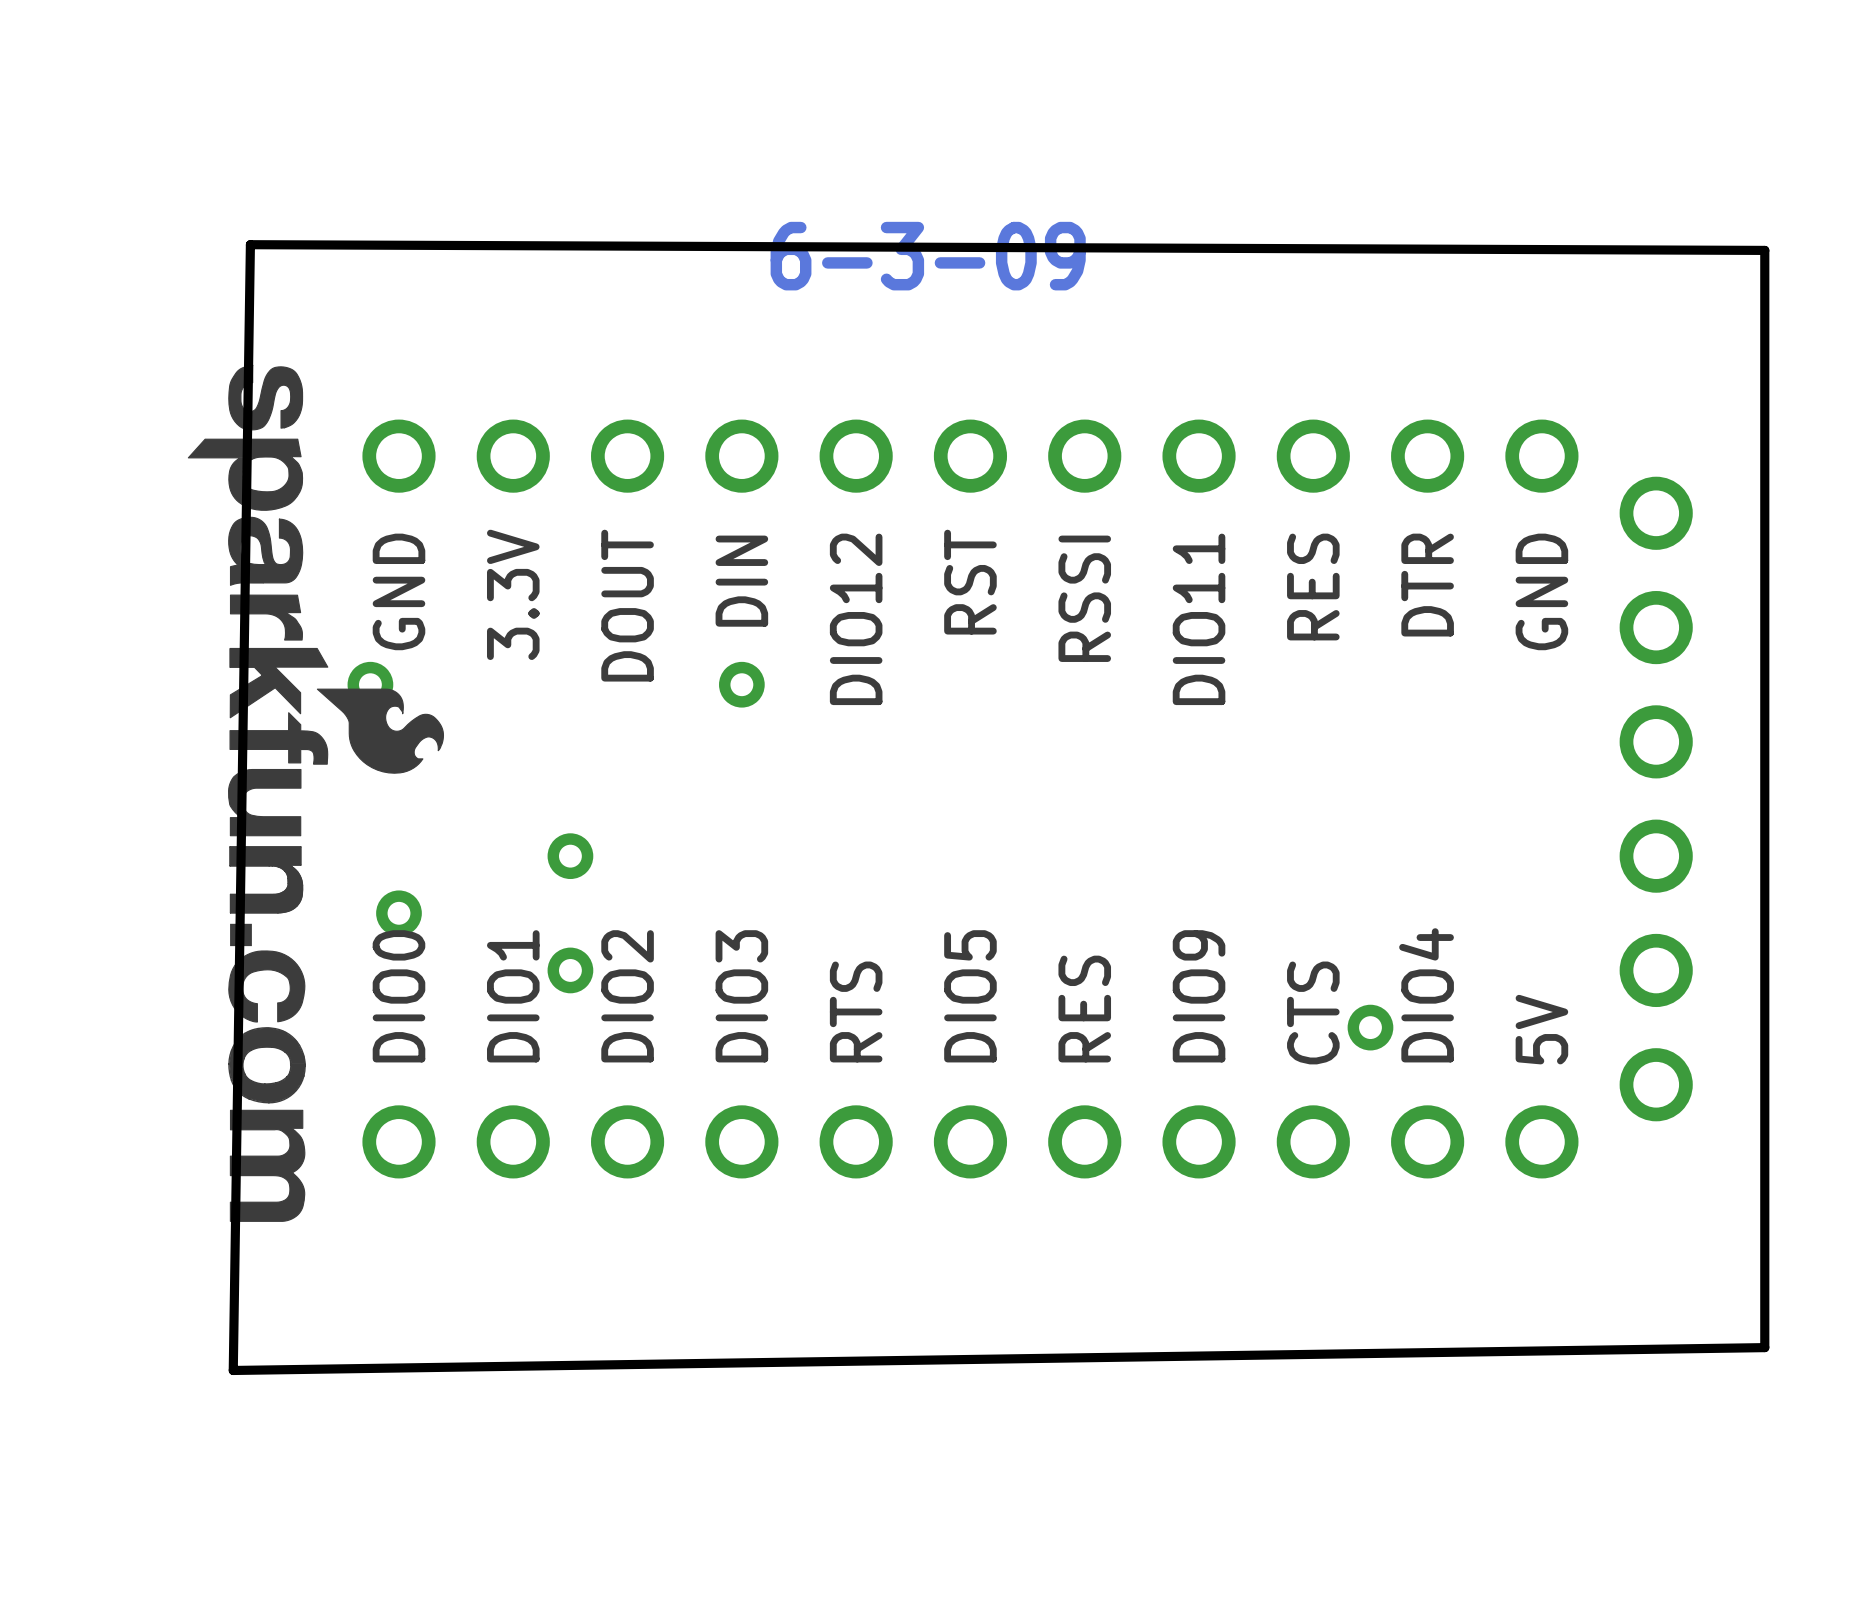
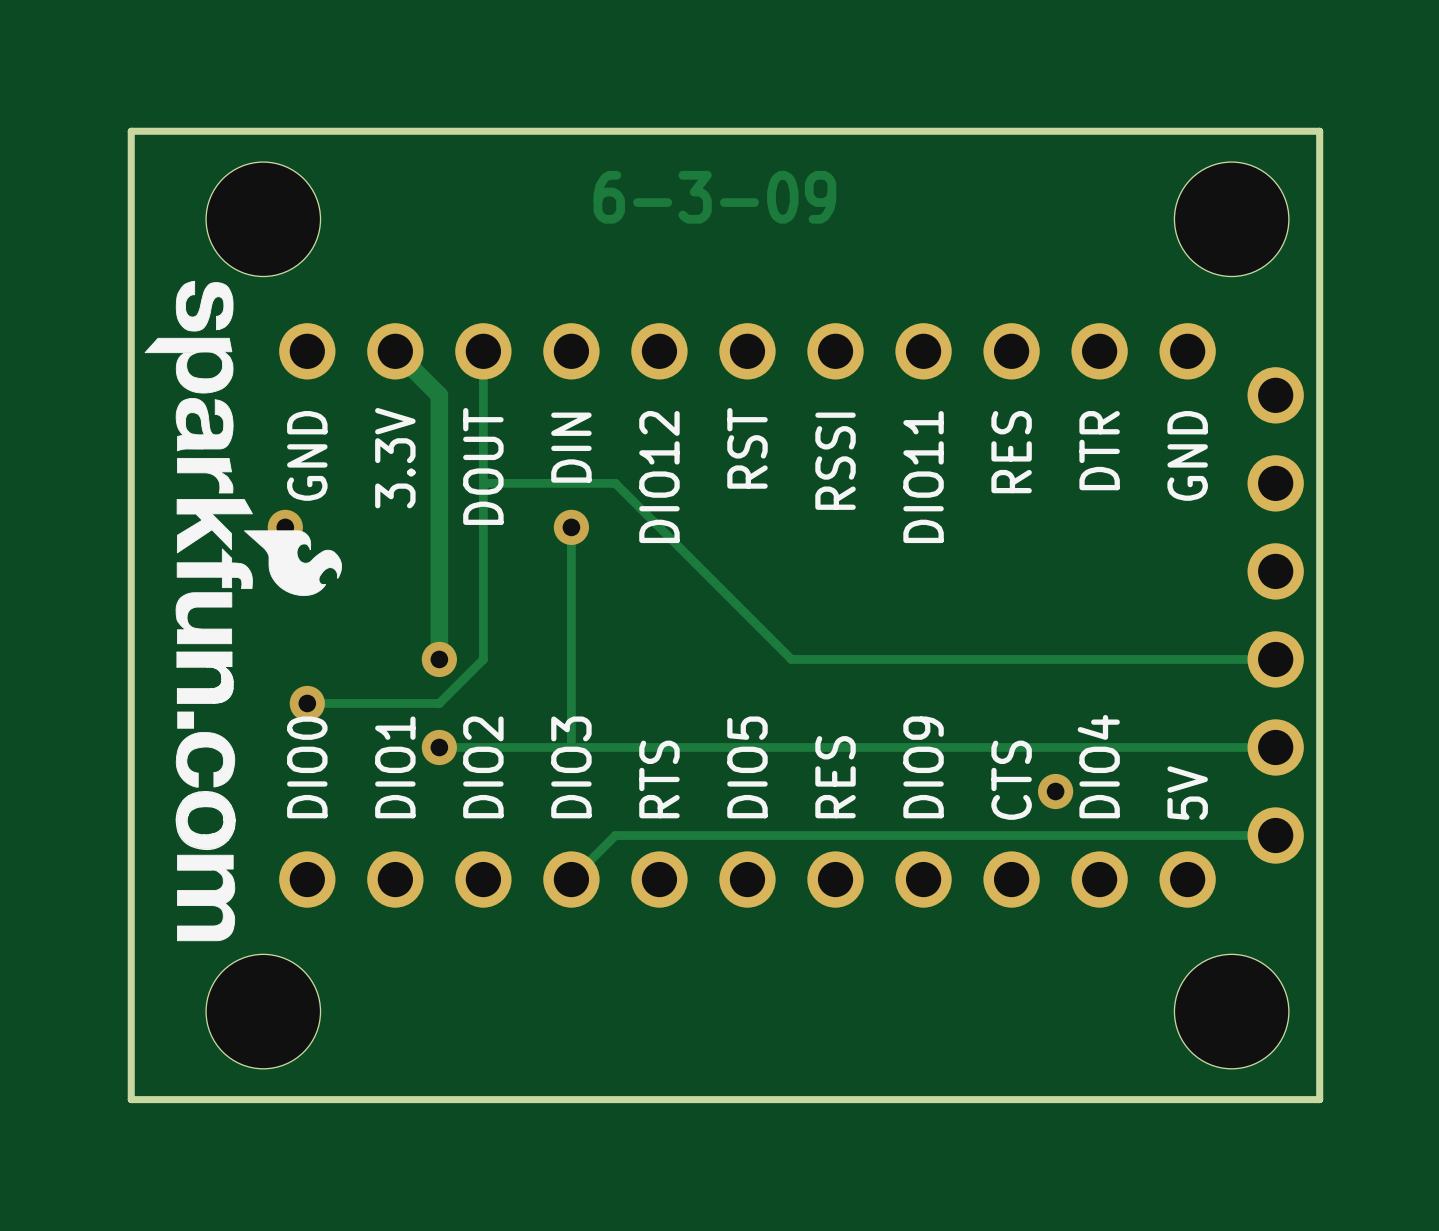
board edge: (250, 244) (233, 1370) (1764, 1347) (1764, 250) (250, 244) -> (1319, 131) (1319, 1099) (131, 1099) (131, 131) (1319, 131)
part: none -> (263, 219)
part: none -> (1231, 219)
track: none -> (395, 351) (439, 395) (439, 659)
track: none -> (483, 351) (483, 659) (439, 703) (307, 703)
track: none -> (483, 483) (615, 483) (791, 659) (1275, 659)
track: none -> (571, 527) (571, 747)
track: none -> (1275, 747) (439, 747)
track: none -> (1275, 835) (615, 835) (571, 879)
part: none -> (263, 1011)
part: none -> (1231, 1011)

